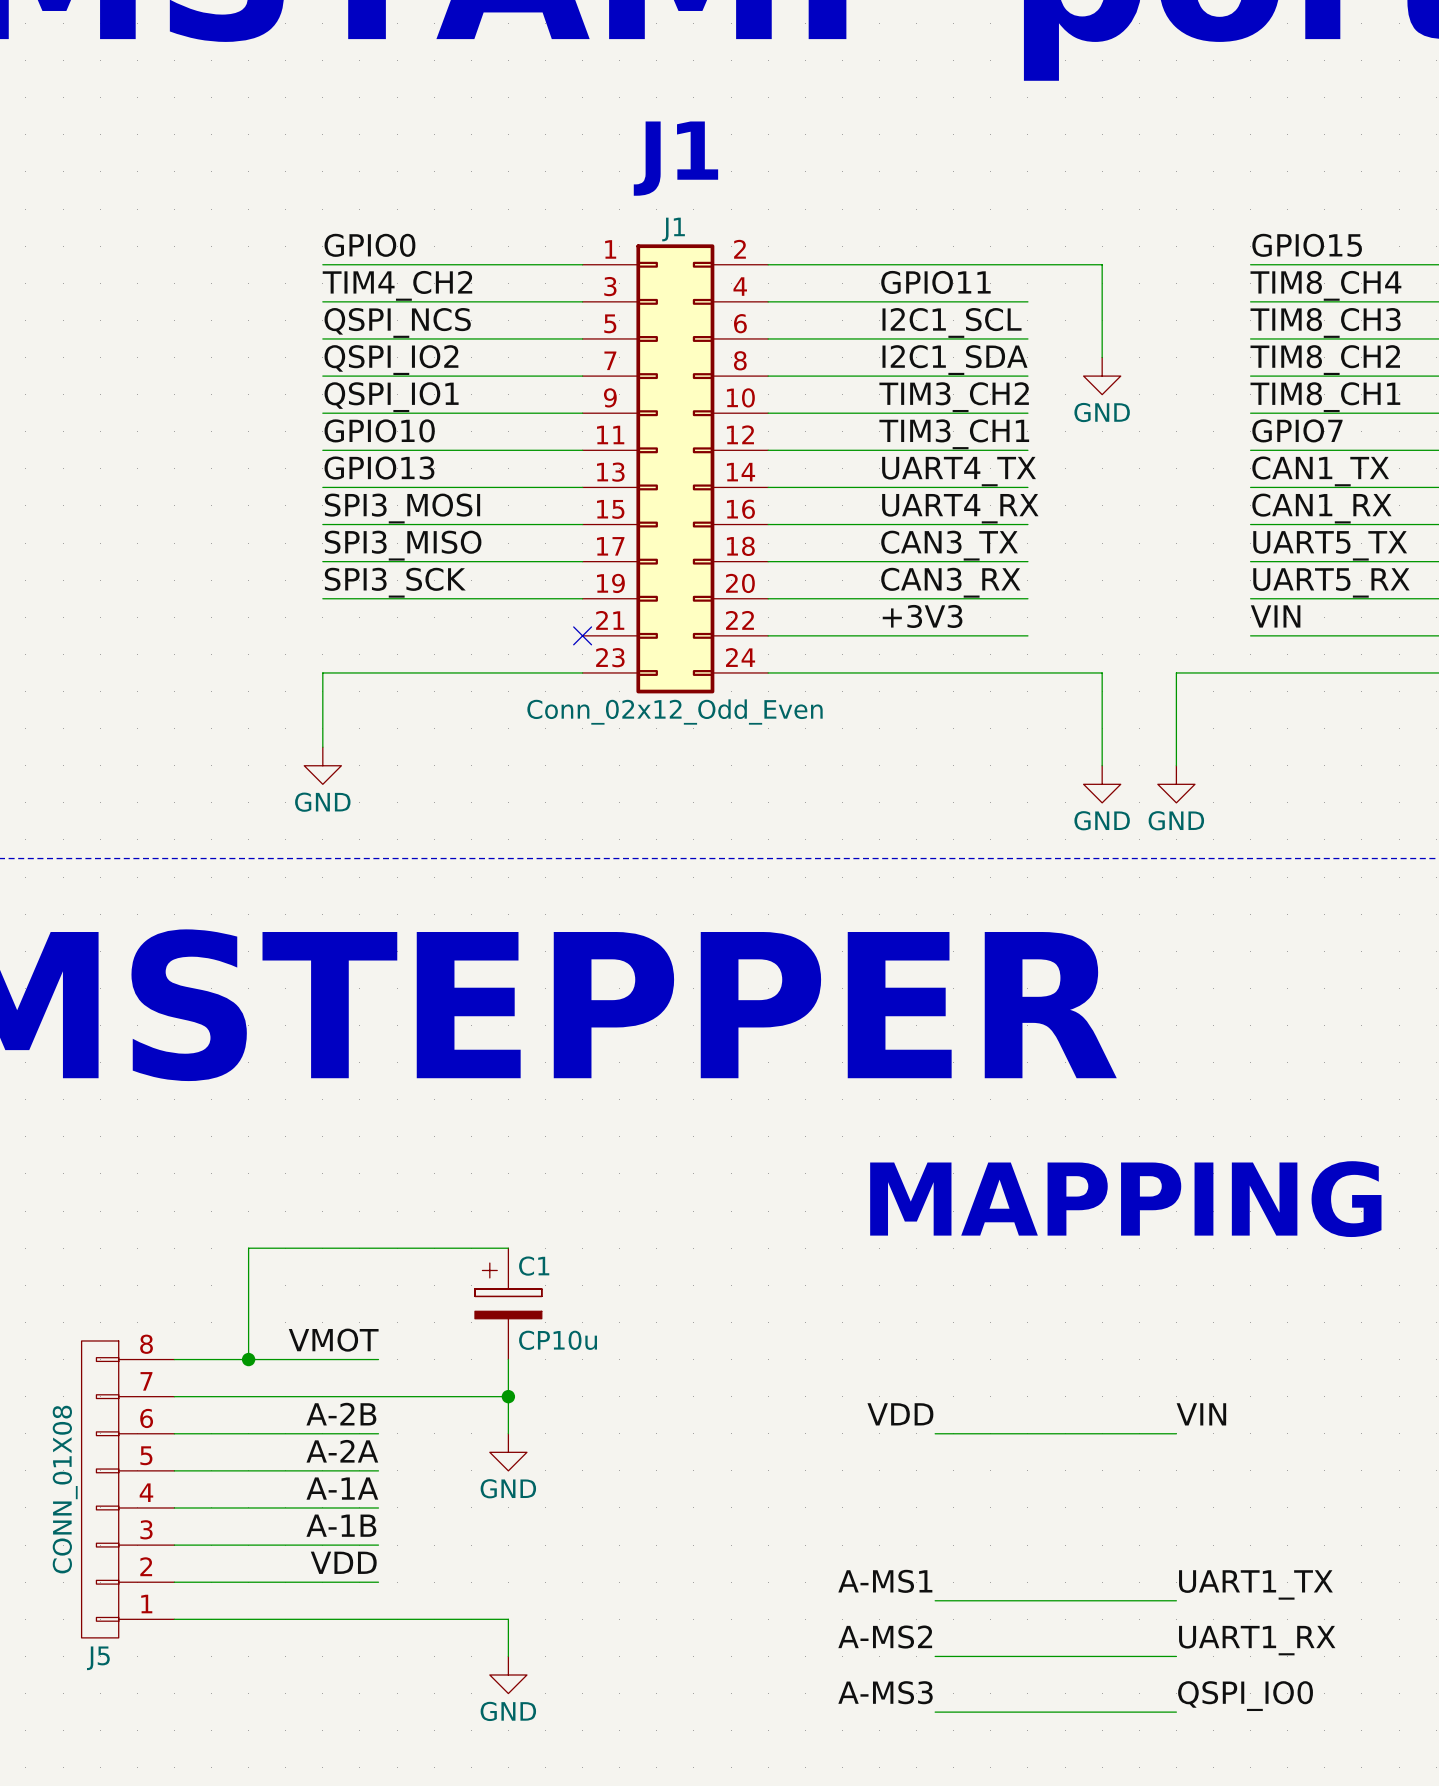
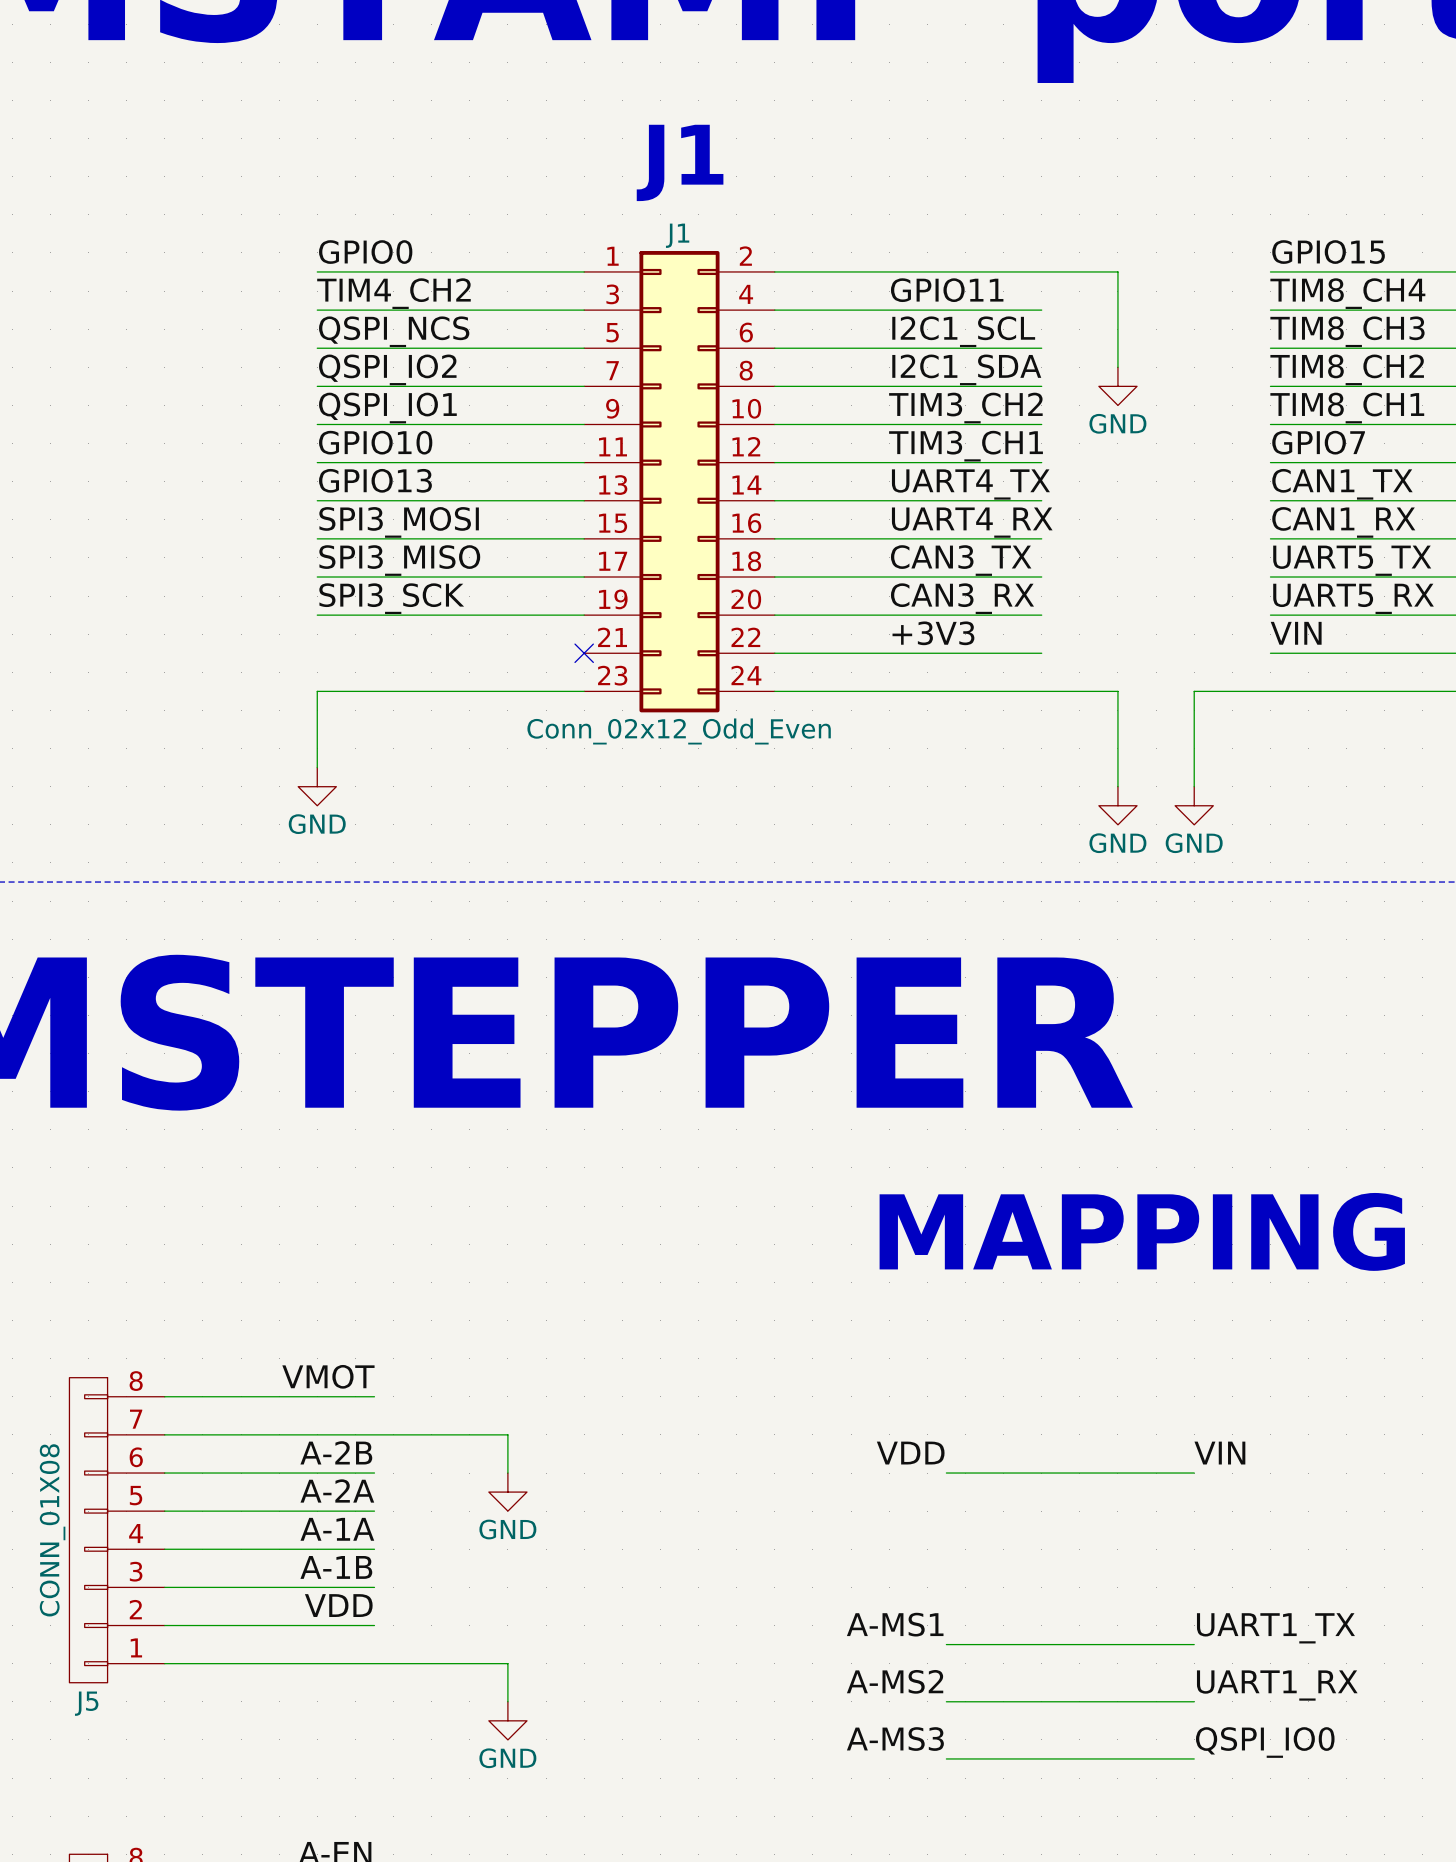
wire: (508, 1248) (248, 1248) (248, 1359) -> none
C1: CP10u (508, 1303) -> none
junction: (248, 1359) -> none
wire: (508, 1359) (508, 1396) -> none
junction: (508, 1396) -> none

